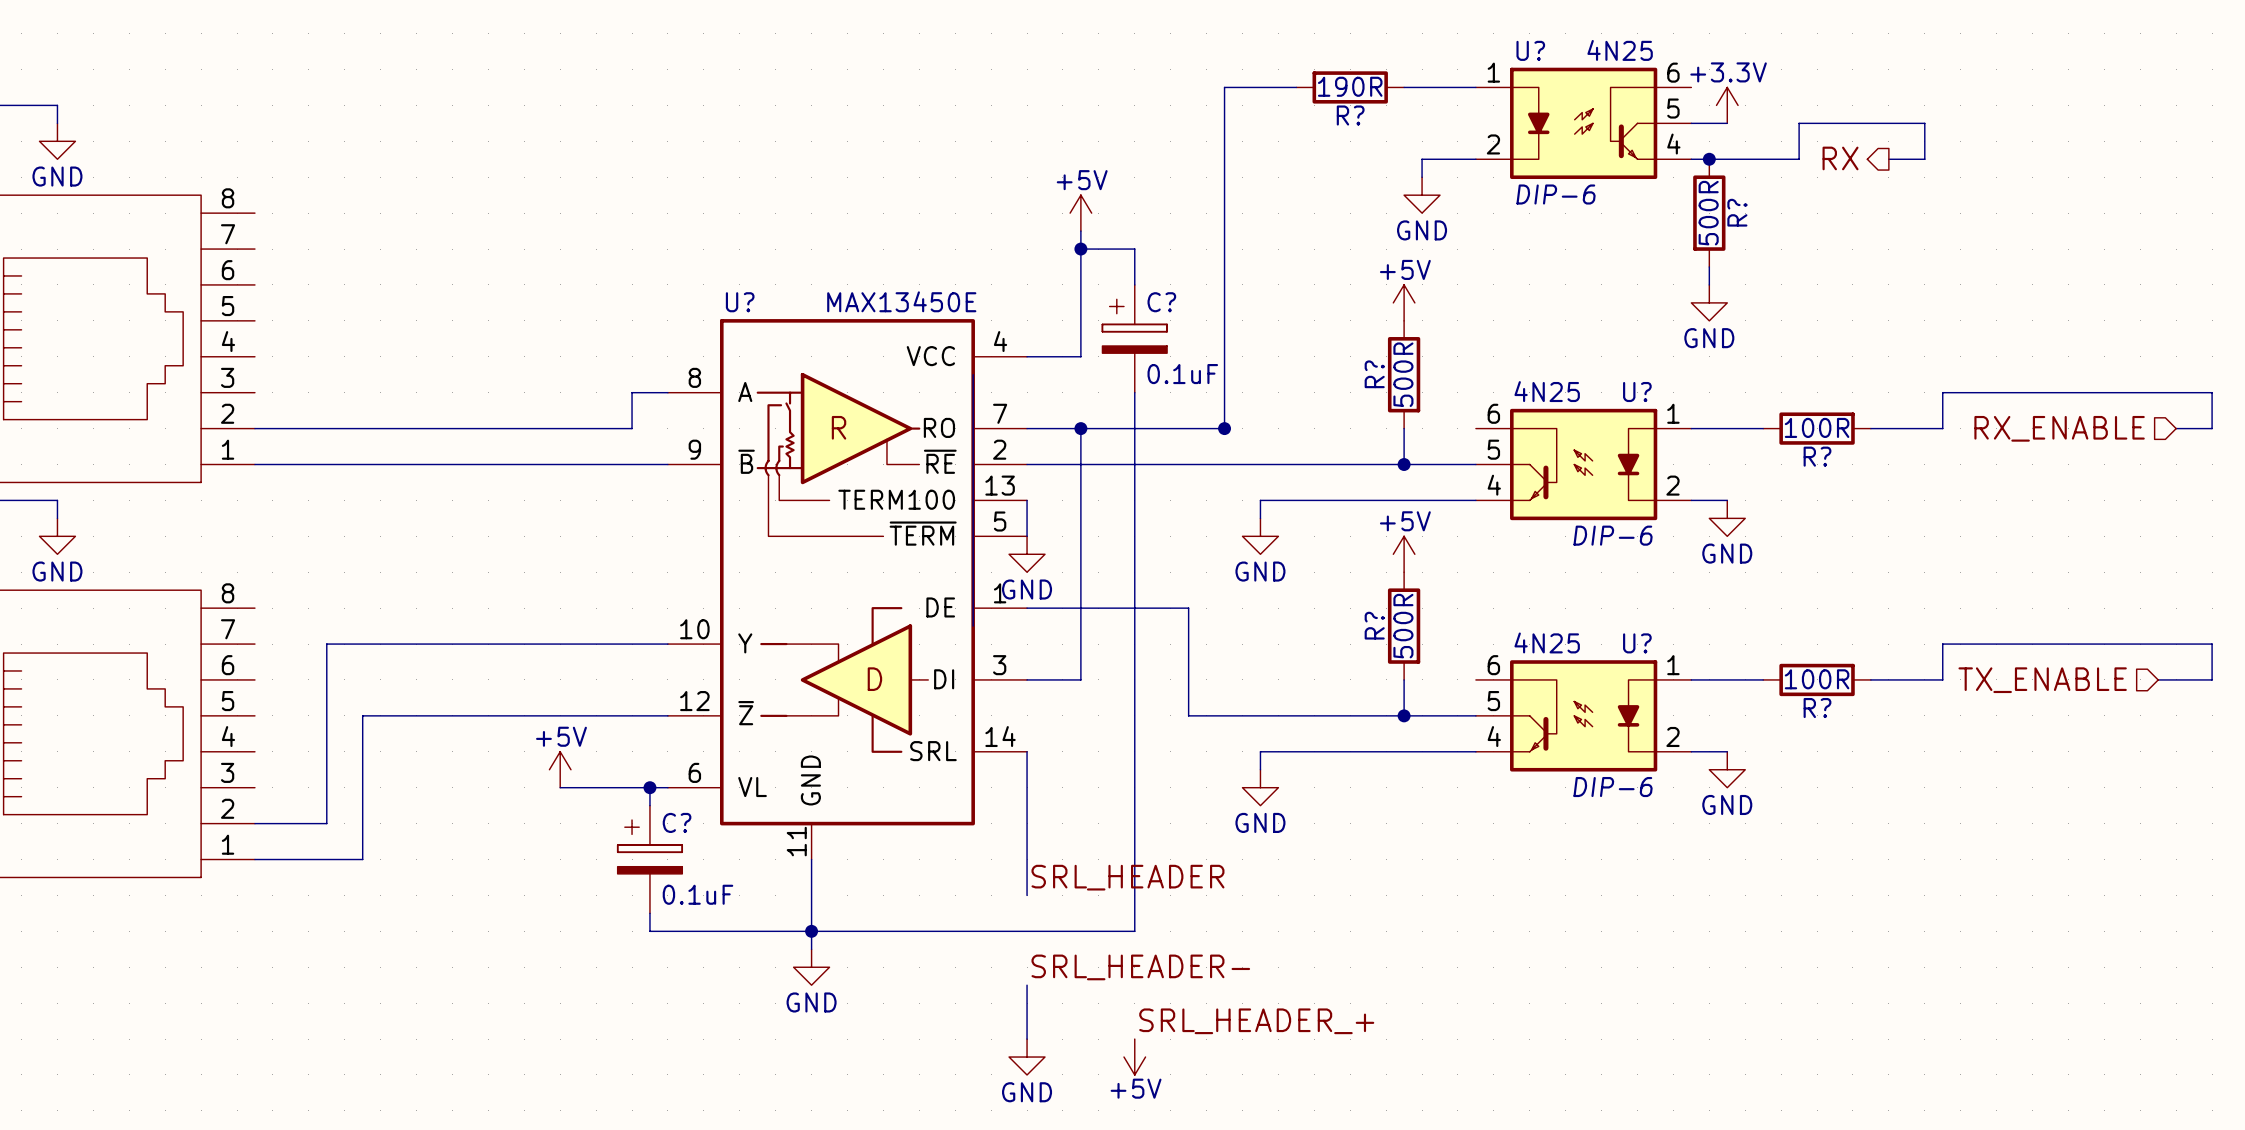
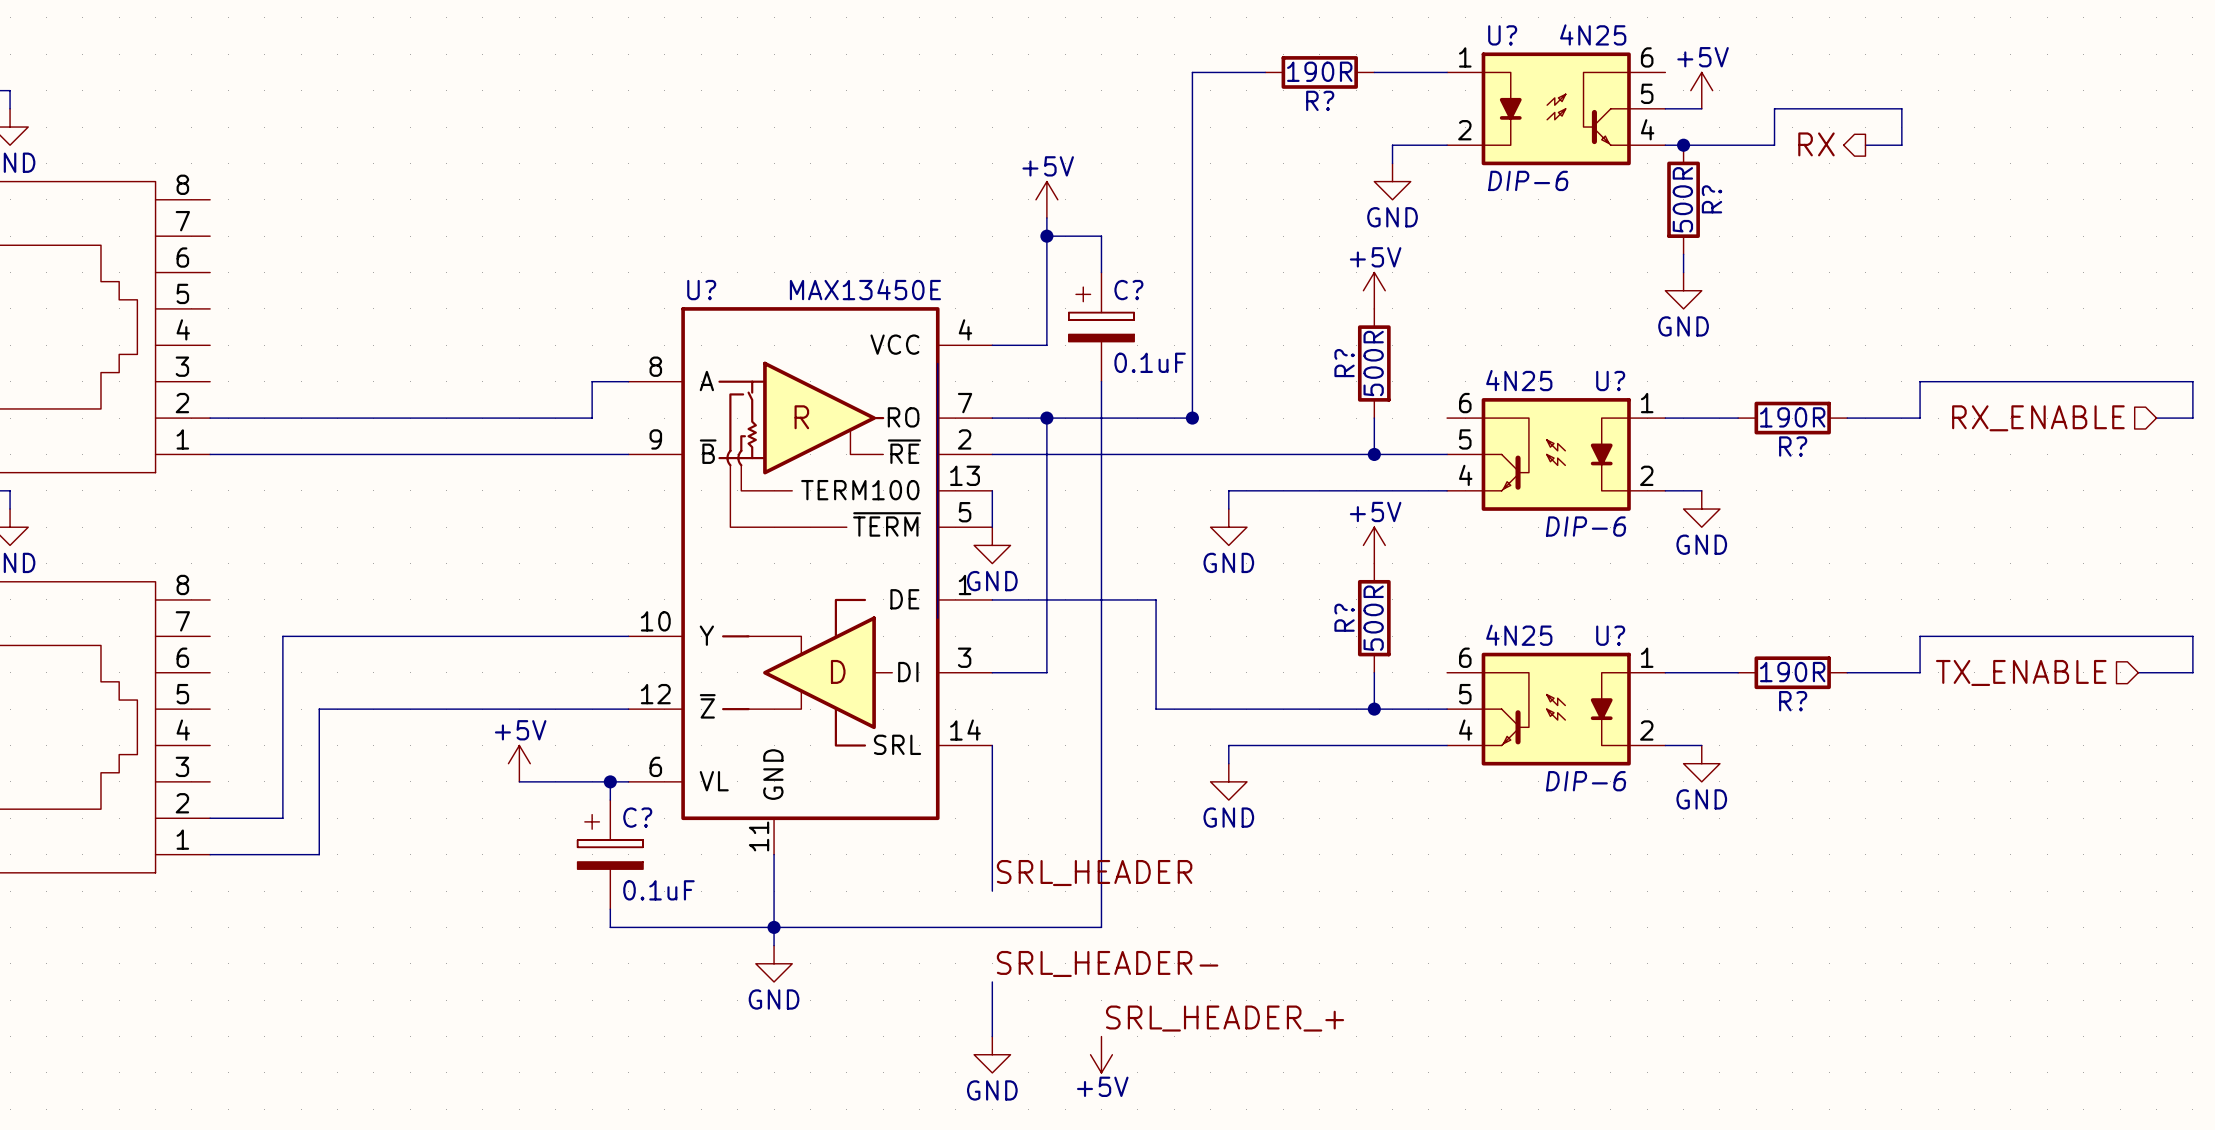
power symbol: +3.3V (1727, 105) -> +5V (1701, 90)
R? value: 100R (1817, 427) -> 190R (1792, 417)
R? value: 100R (1817, 679) -> 190R (1792, 672)

